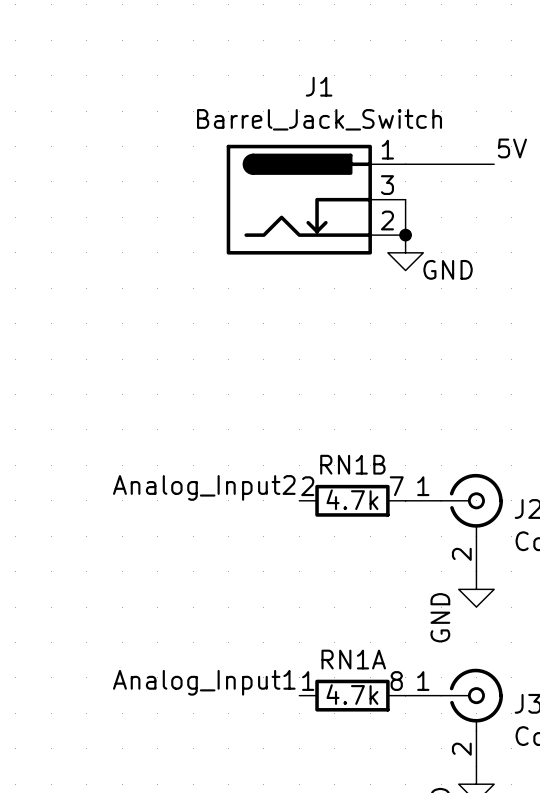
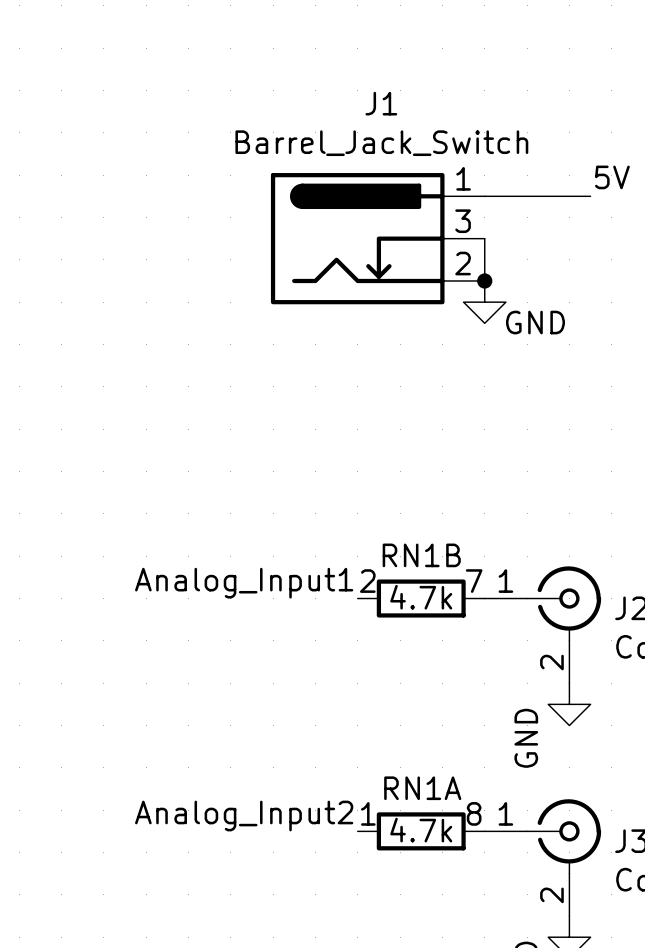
label: Analog_Input2 (204, 487) -> Analog_Input1 (244, 583)
label: Analog_Input1 (204, 682) -> Analog_Input2 (244, 816)

